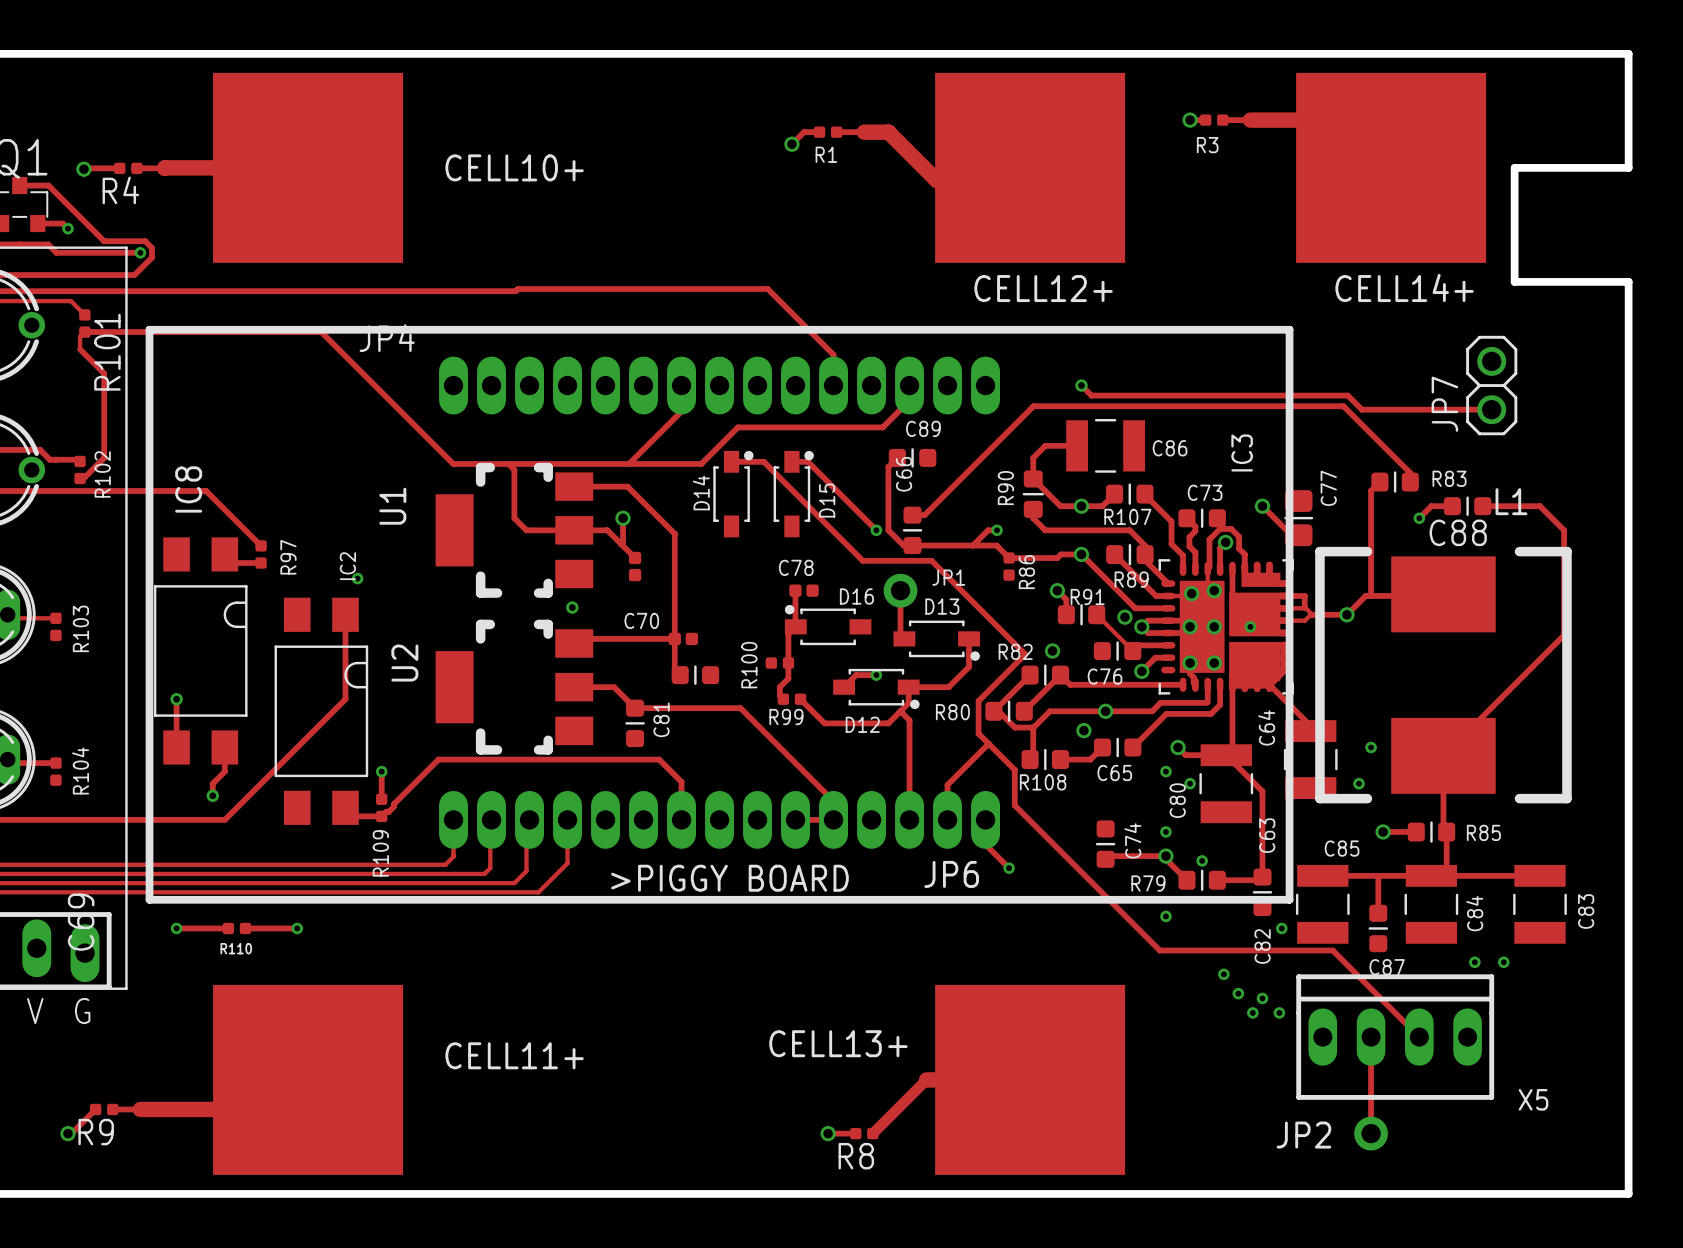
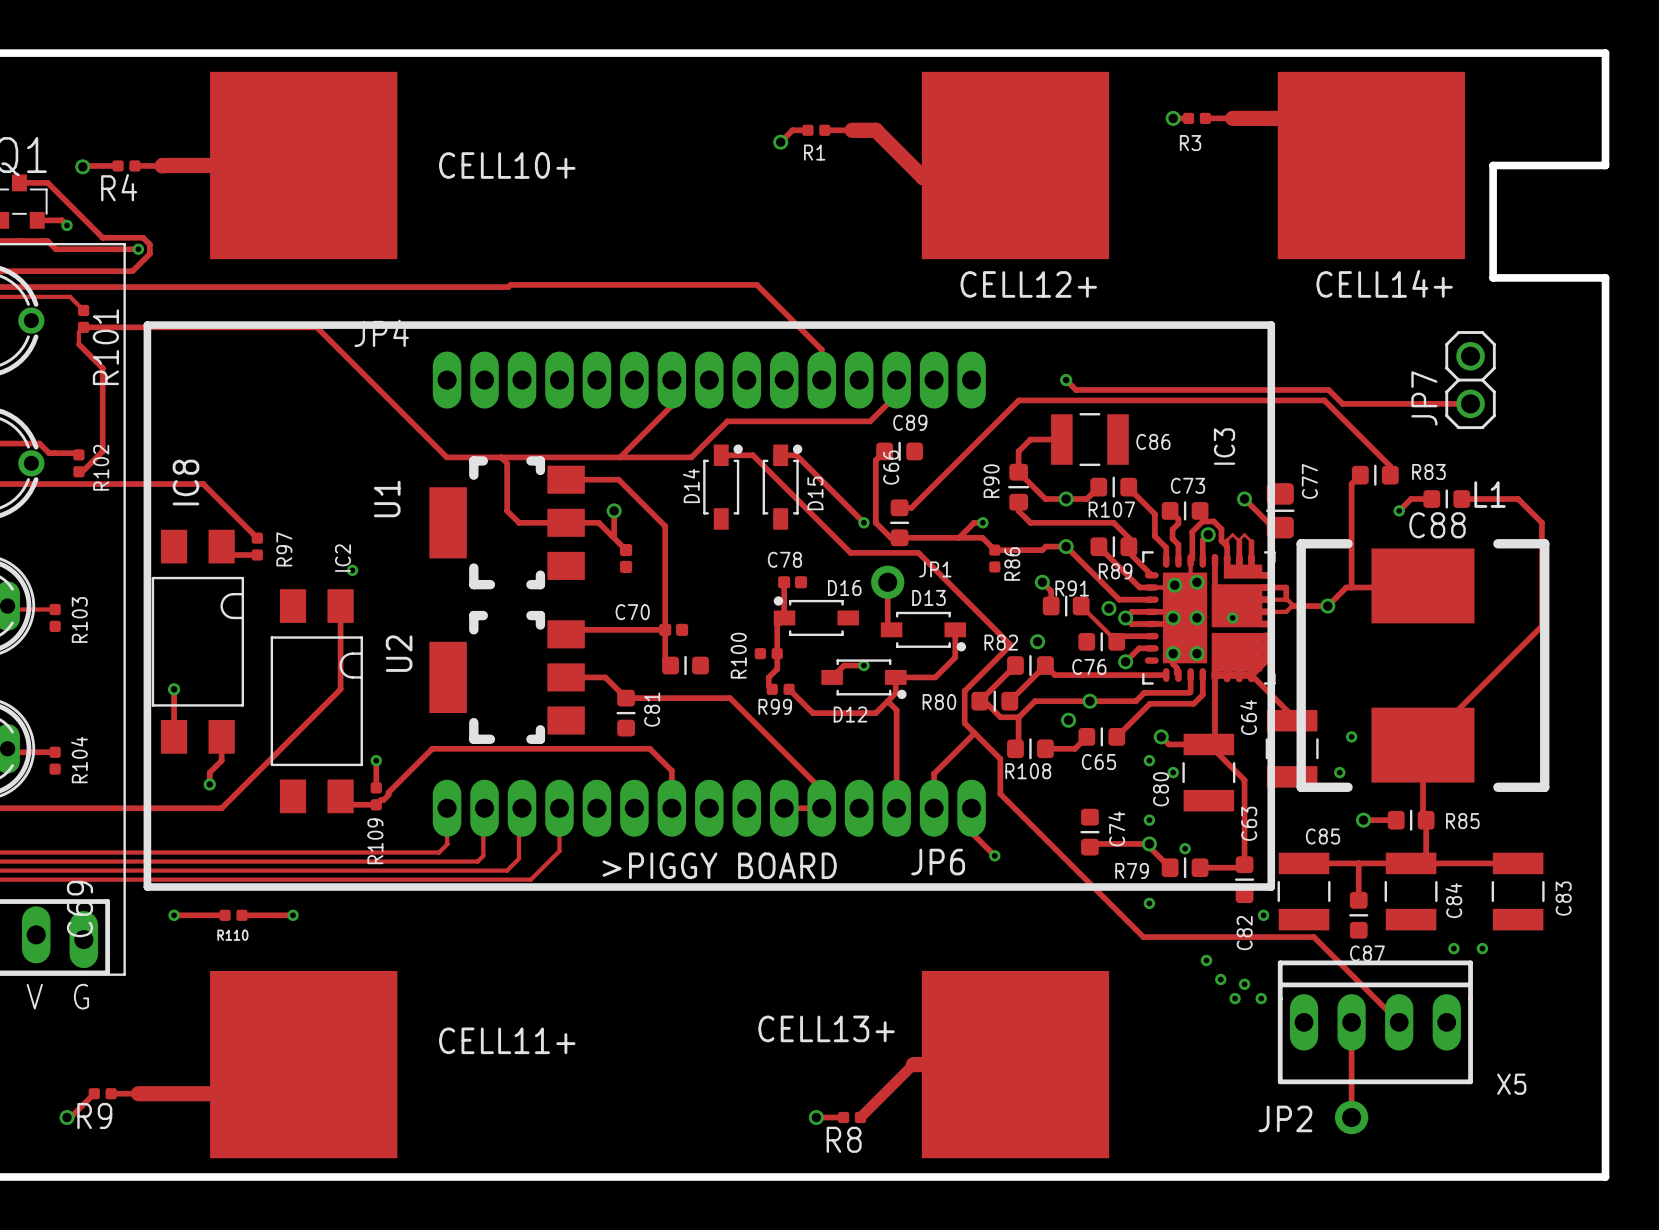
track: none -> (1238, 540) (1244, 534) (1251, 541) (1251, 560)
track: none -> (1227, 546) (1227, 540) (1232, 534) (1239, 541) (1239, 560)
via: (572, 607) -> none

